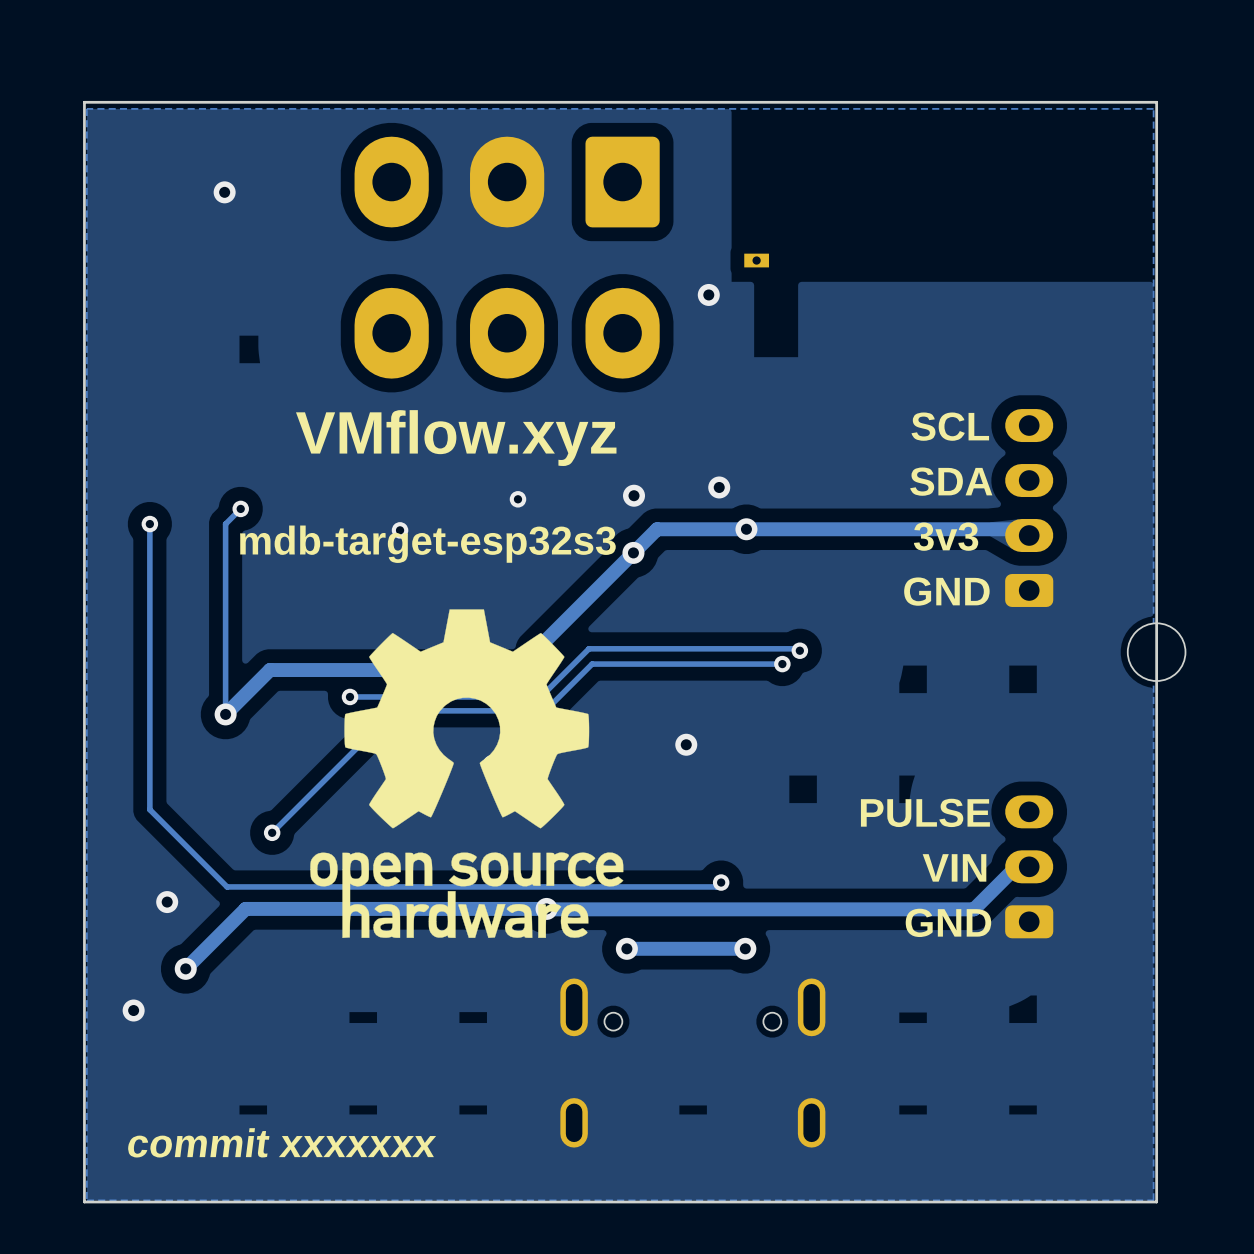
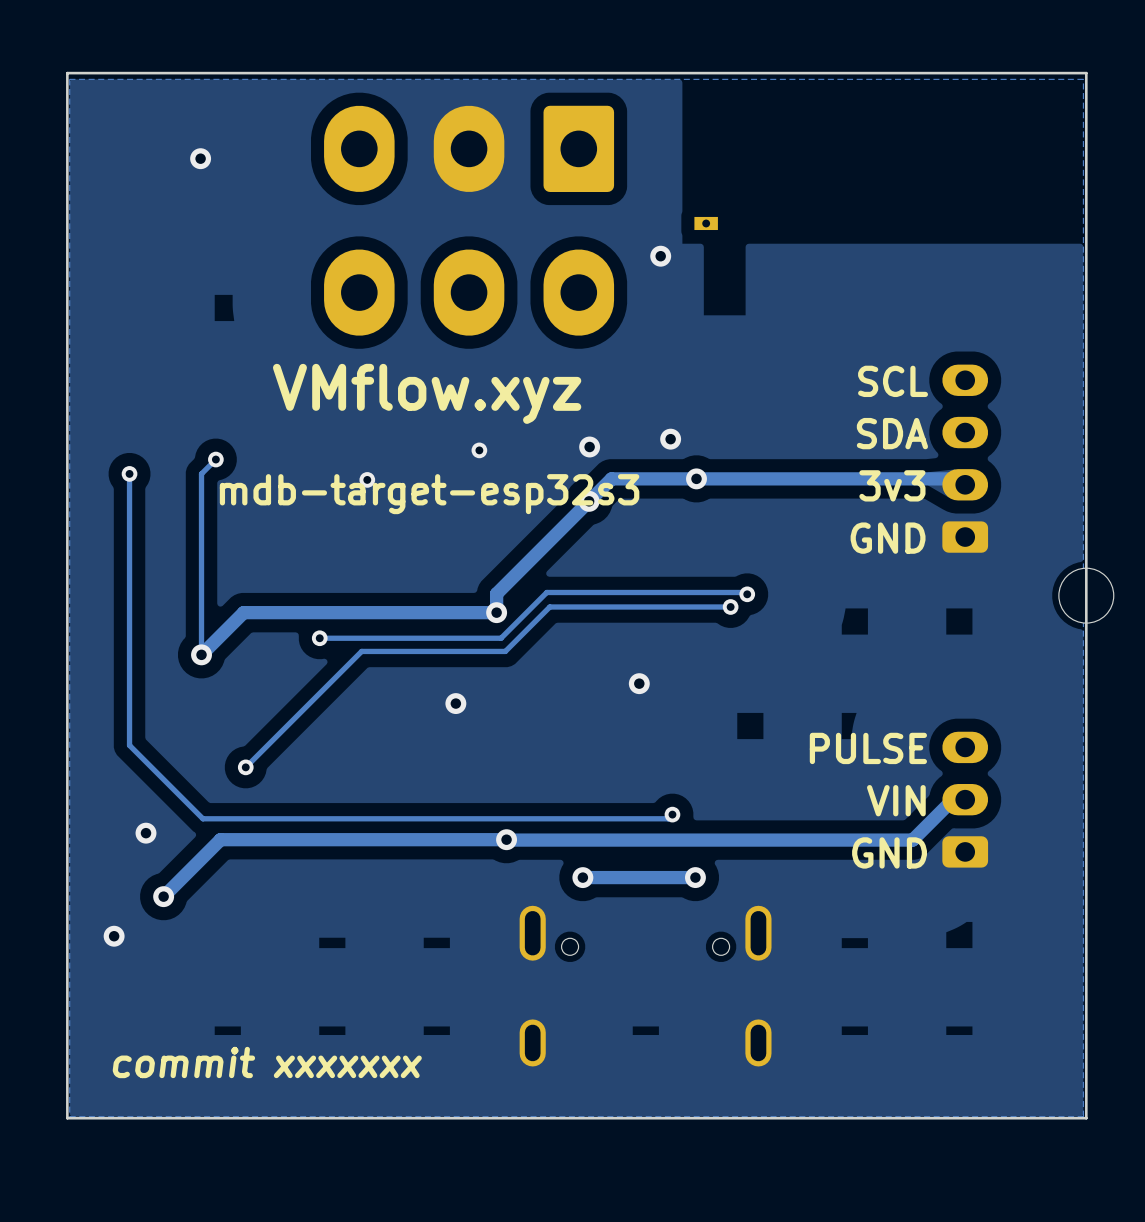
drawing: [310, 609, 624, 938] -> none

